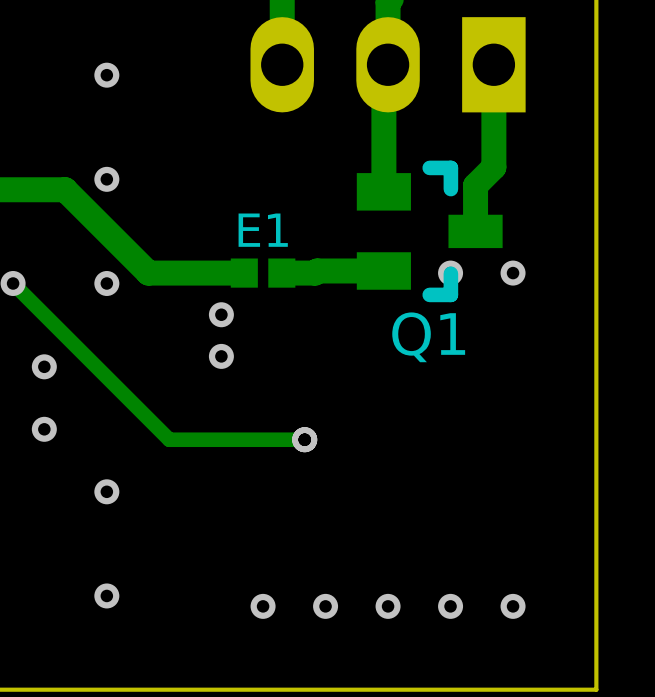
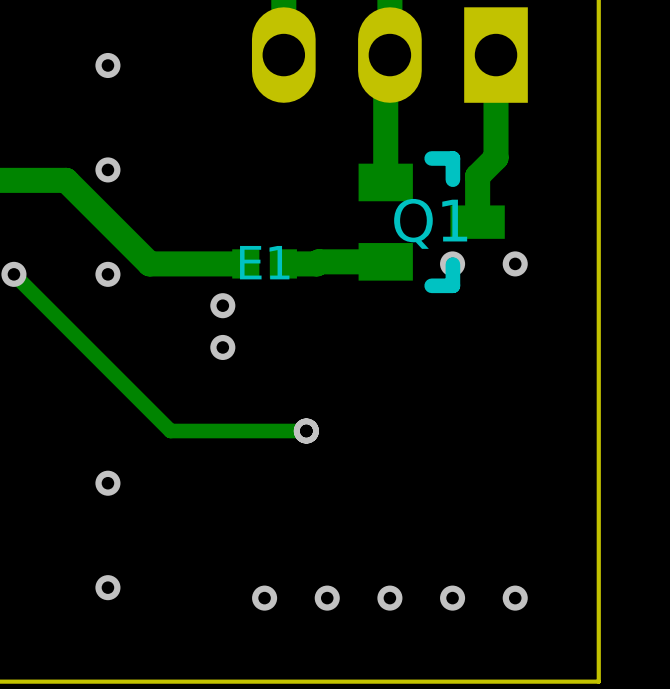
E1 name position: E1 (263, 230) -> E1 (264, 262)
Q1 name position: Q1 (428, 337) -> Q1 (430, 223)
via: (44, 366) -> none
via: (44, 429) -> none

